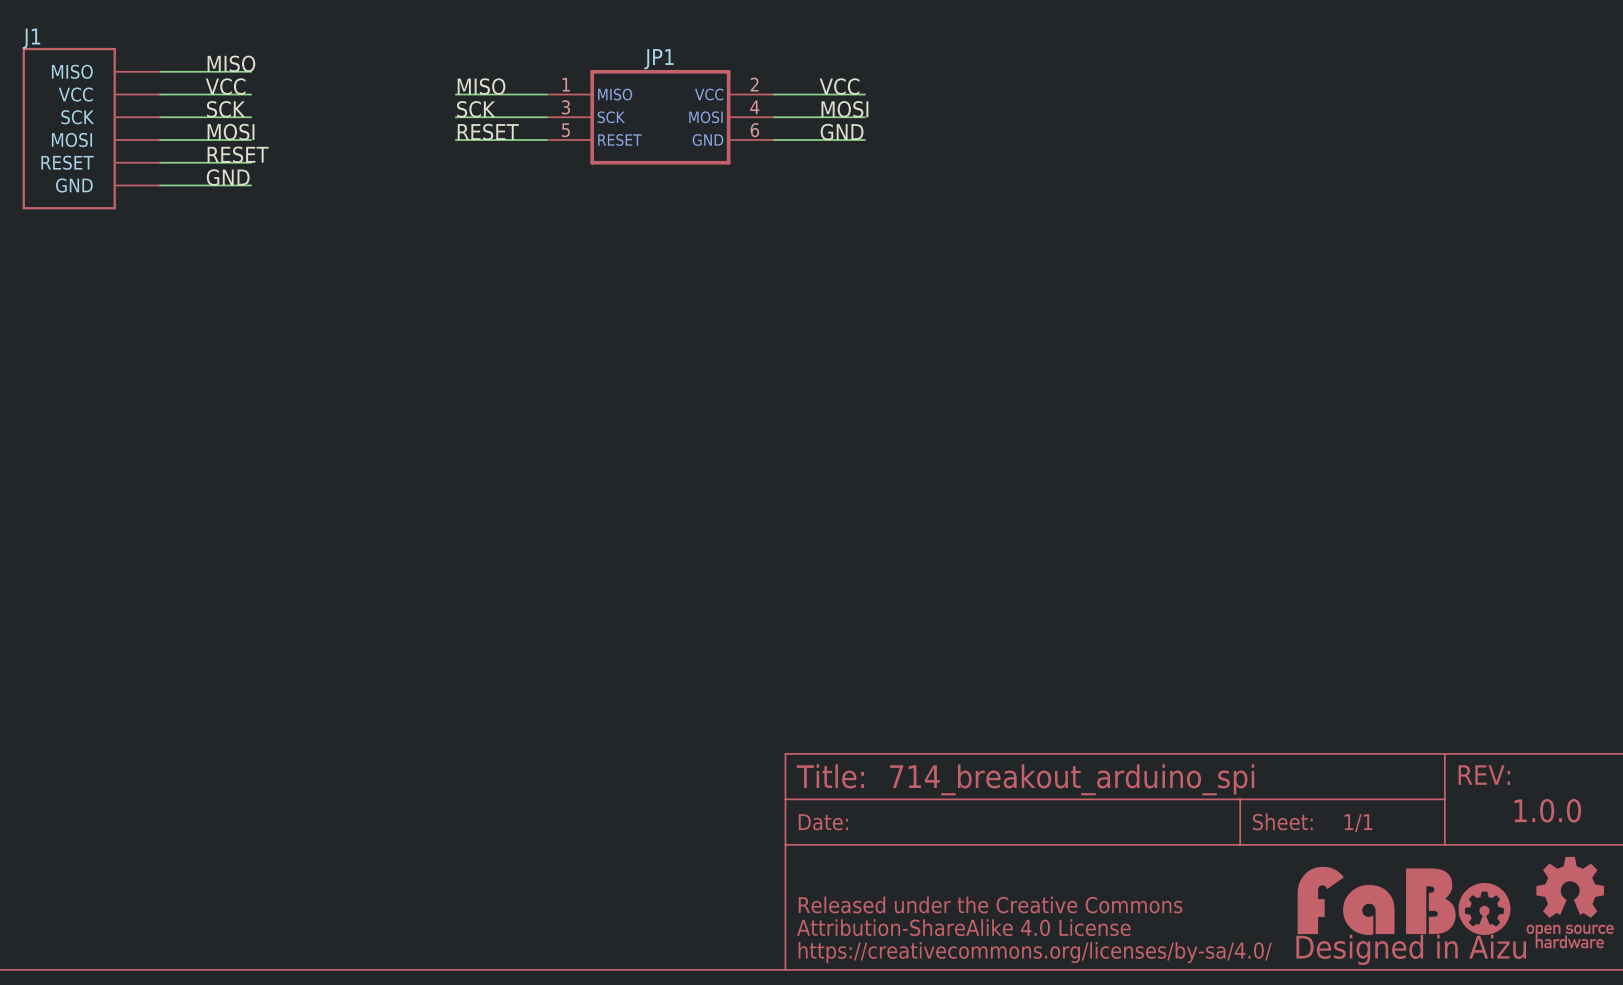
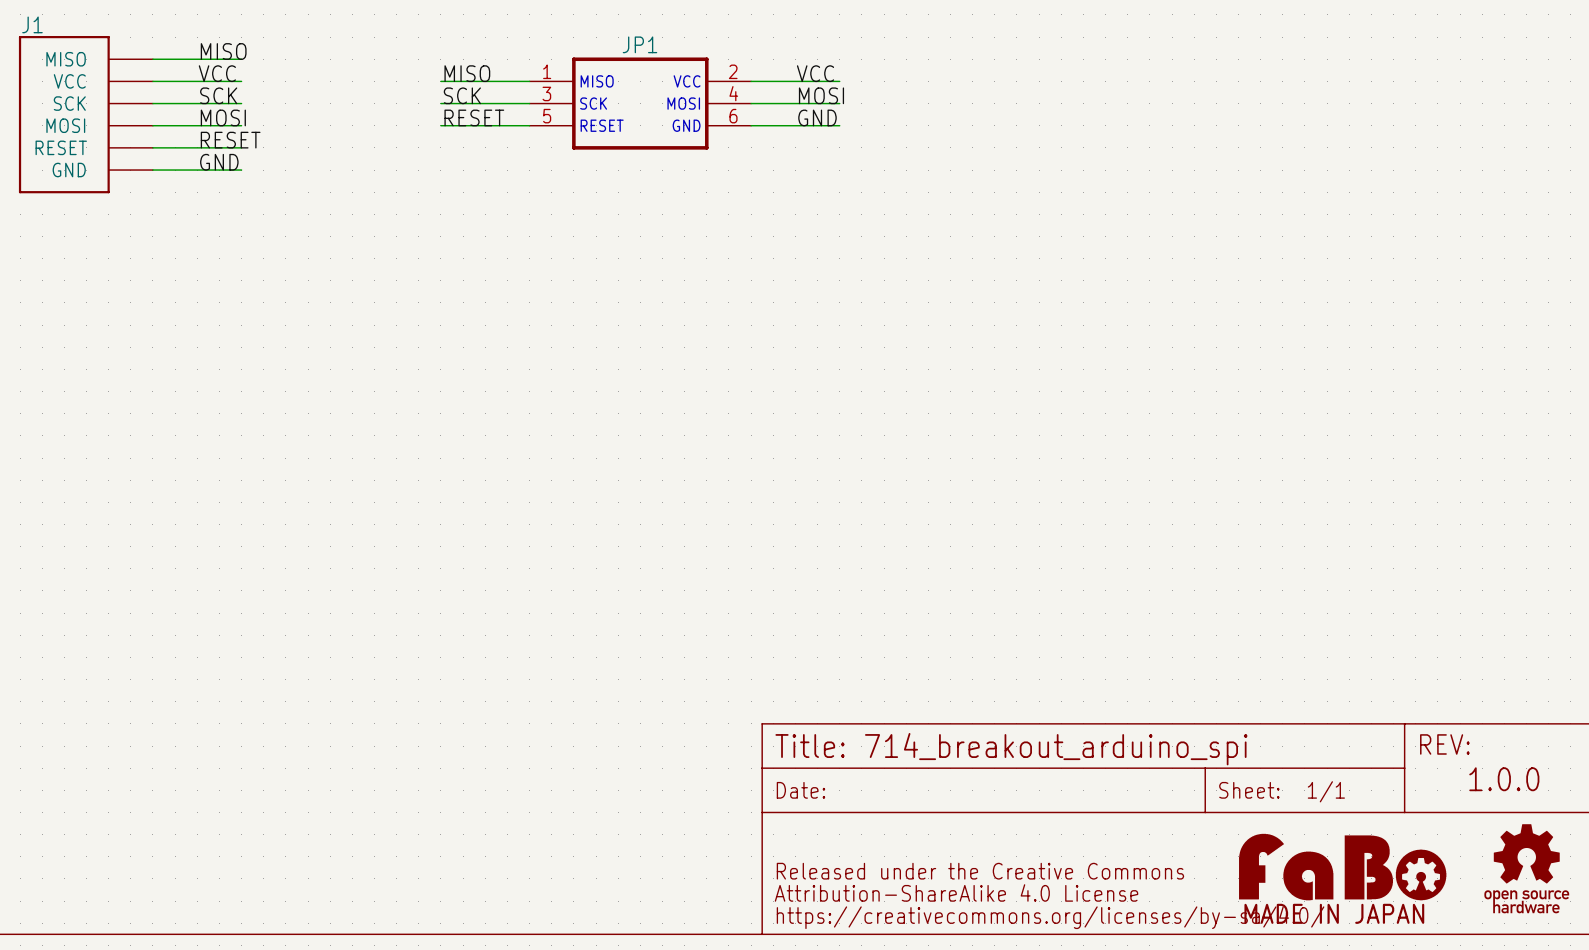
part: none -> (1342, 867)
part: (1404, 900) -> none

